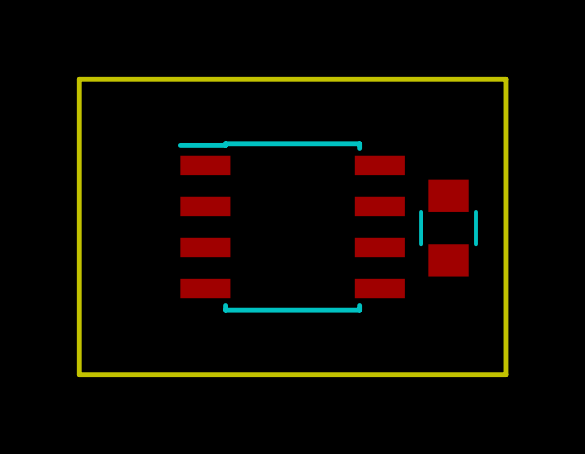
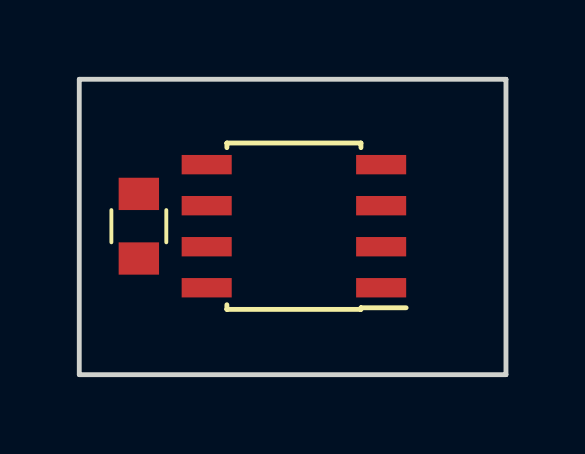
part rotation: 0° (291, 226) -> 180° (295, 226)
part position: (448, 228) -> (138, 226)

